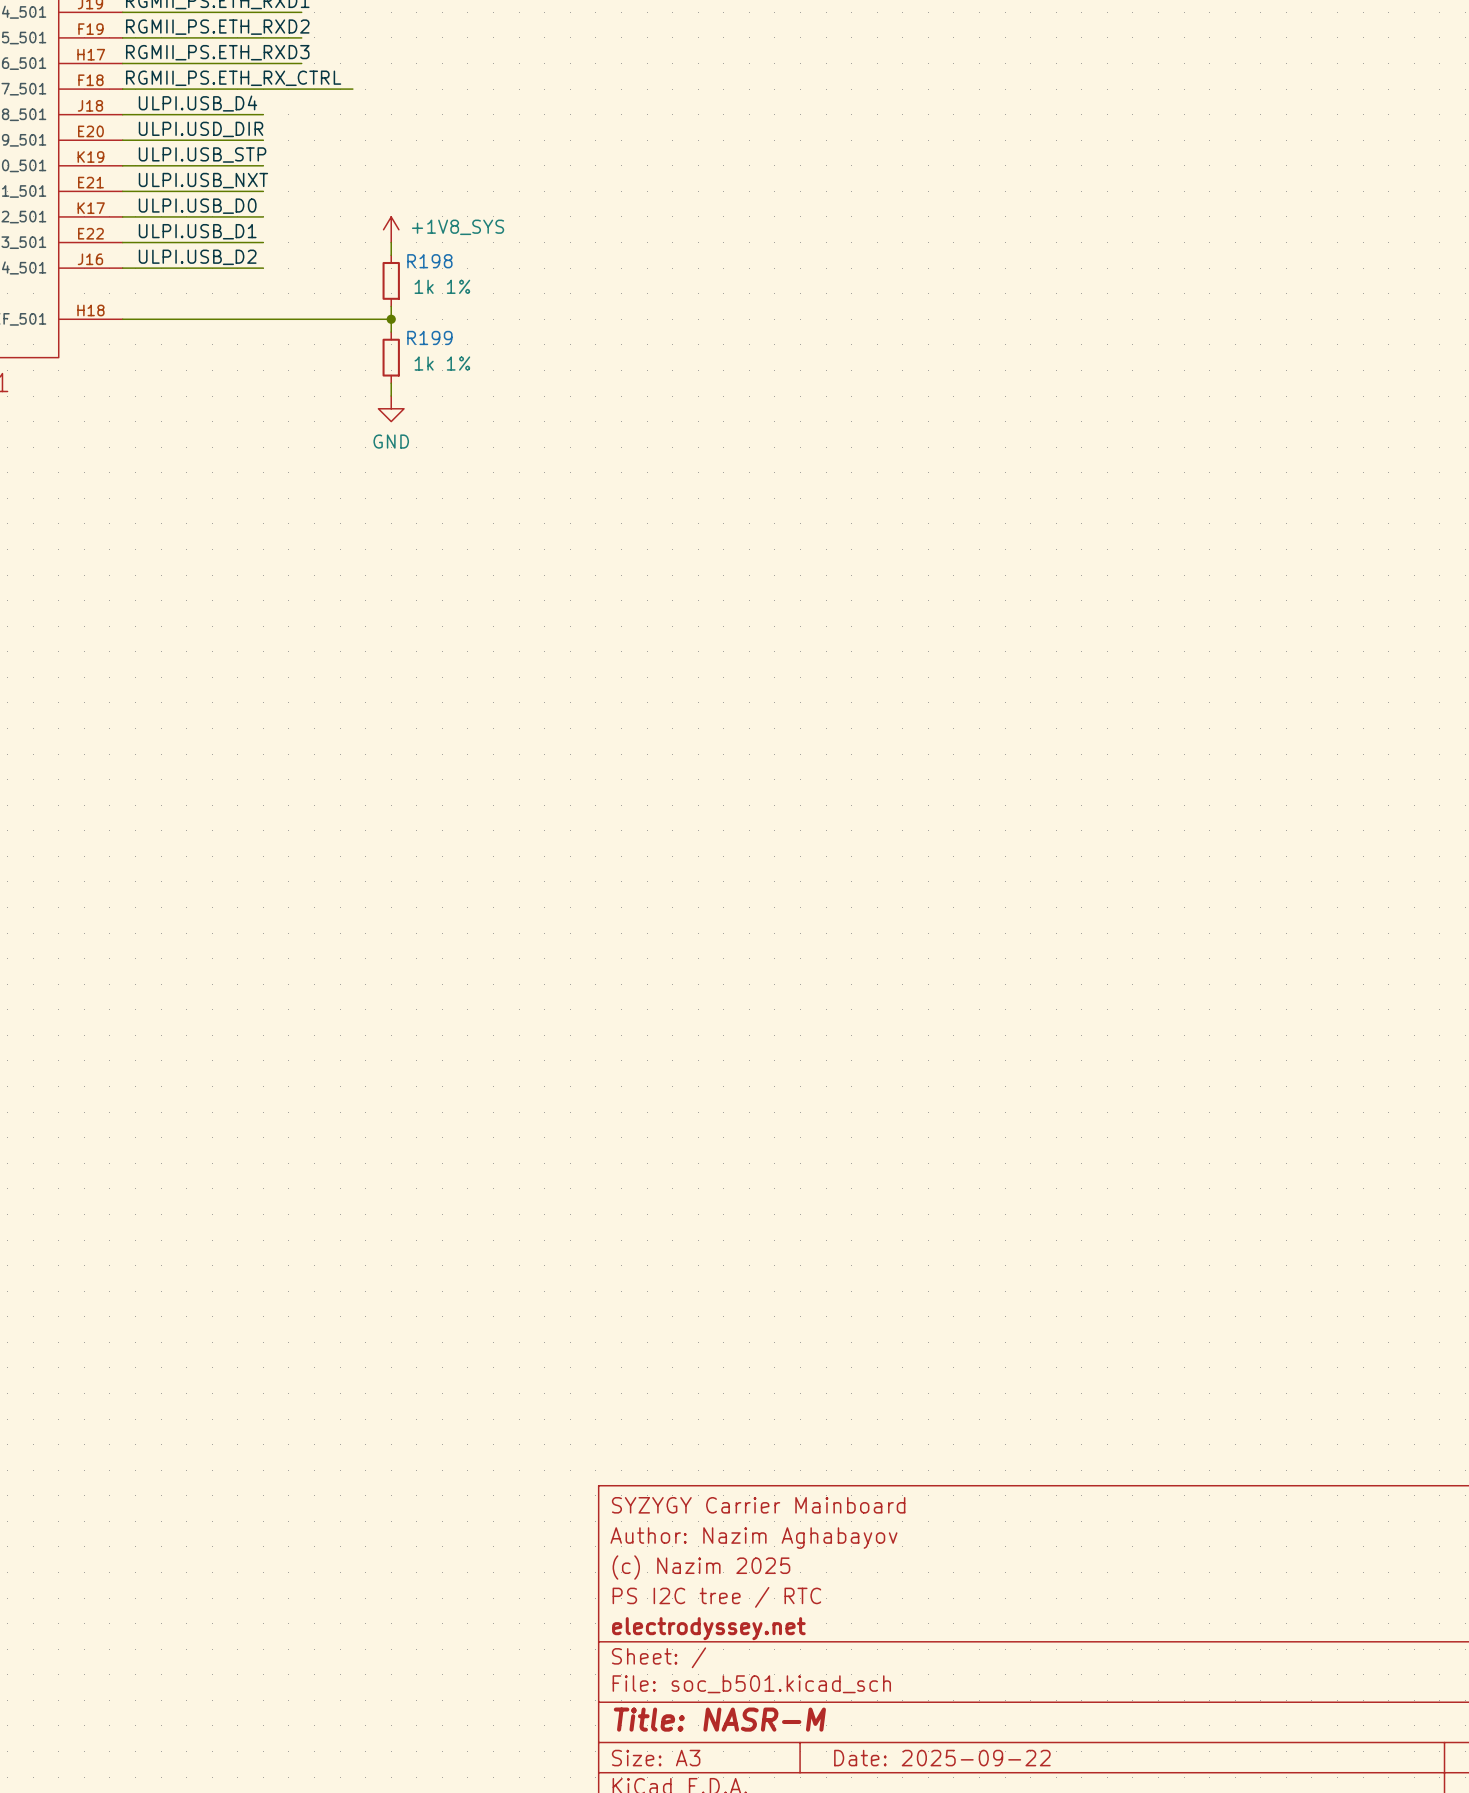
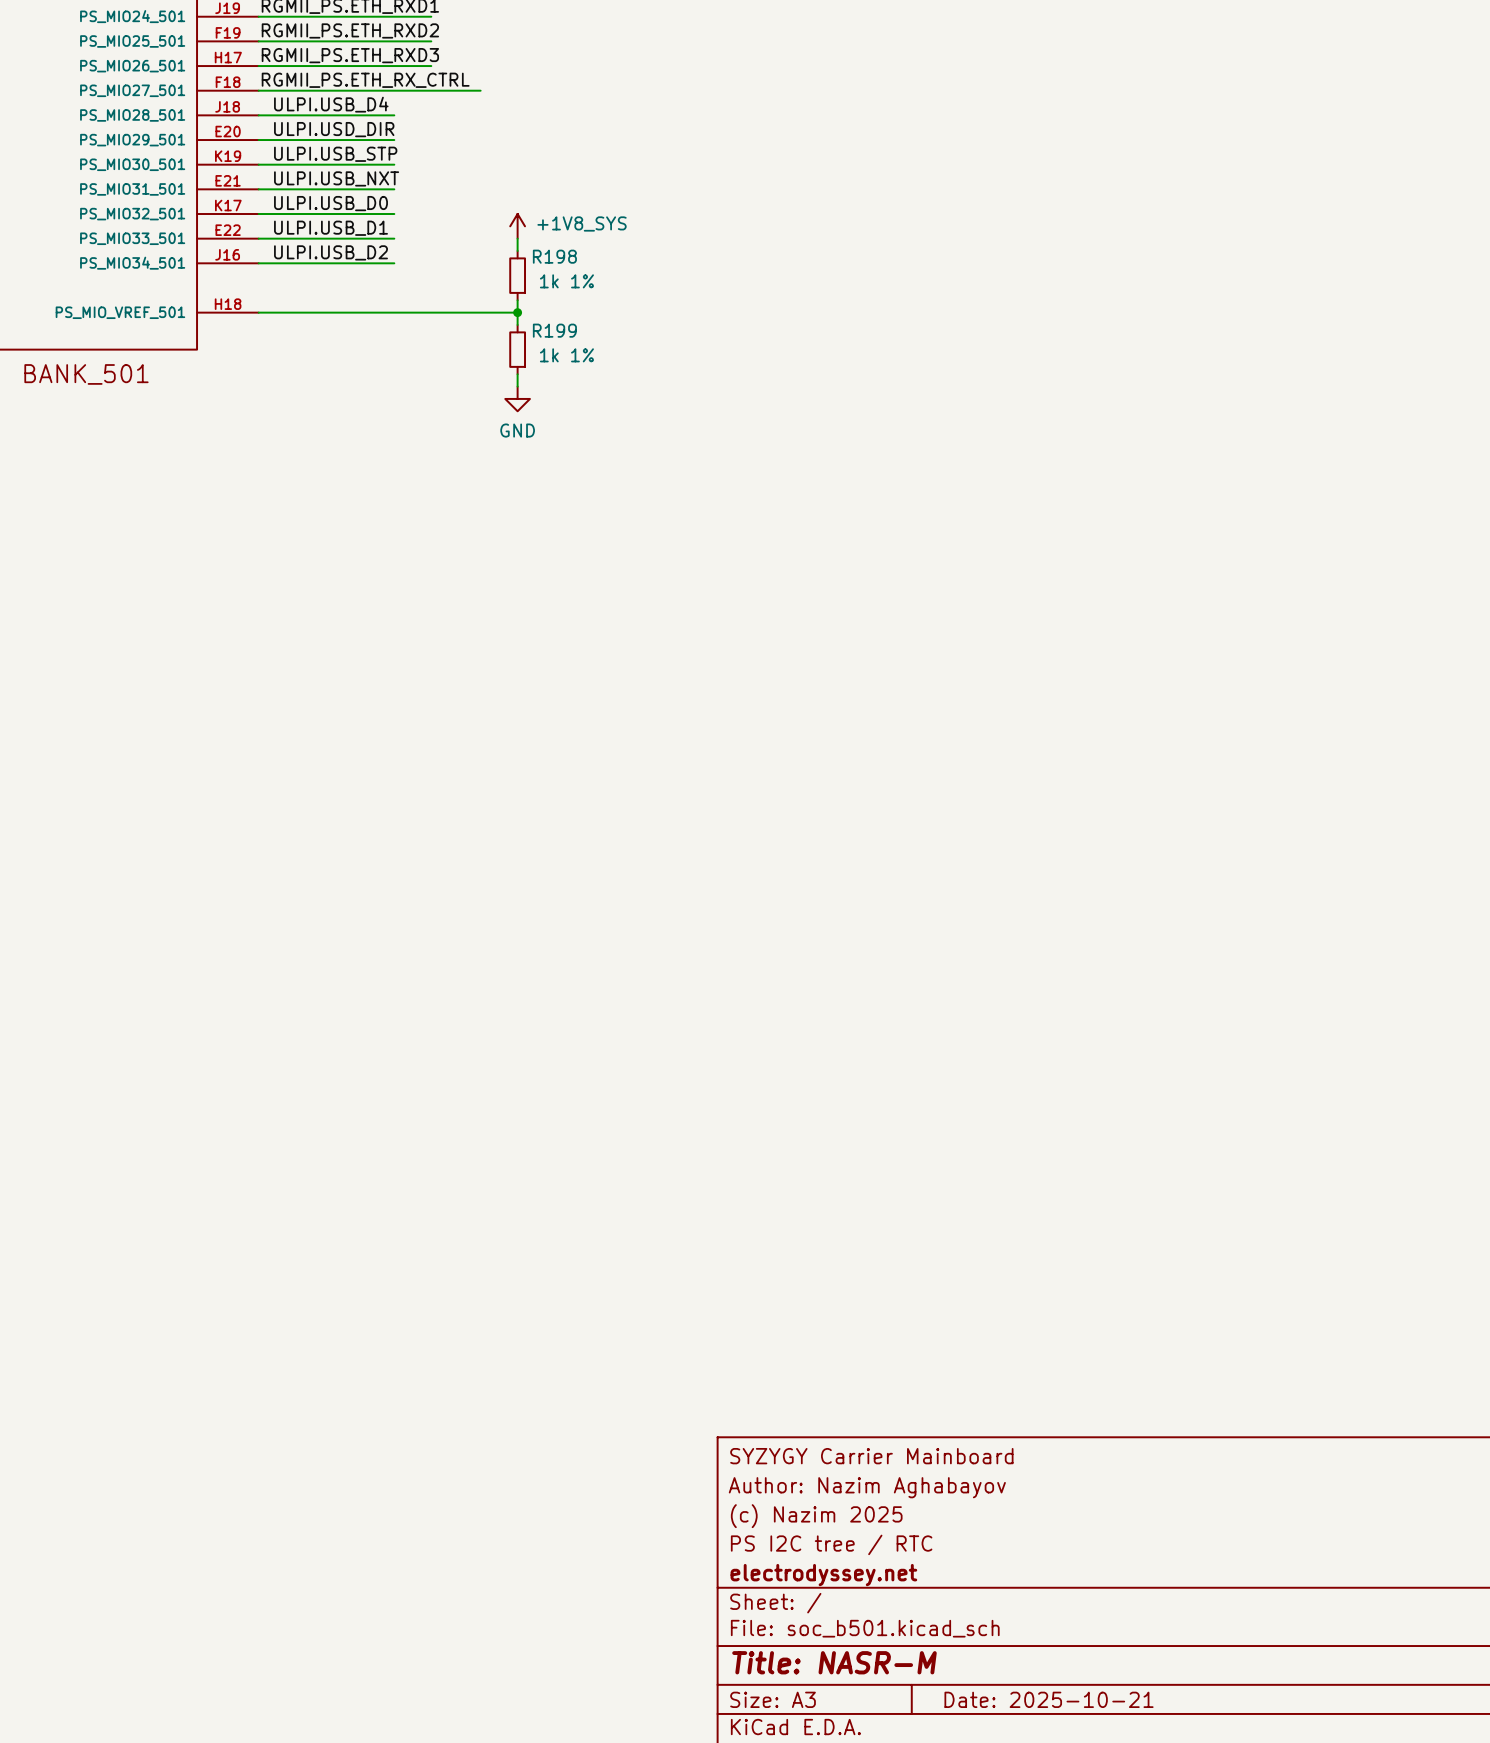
title block: Date: 2025-09-22 (942, 1758) -> Date: 2025-10-21 (1049, 1699)

